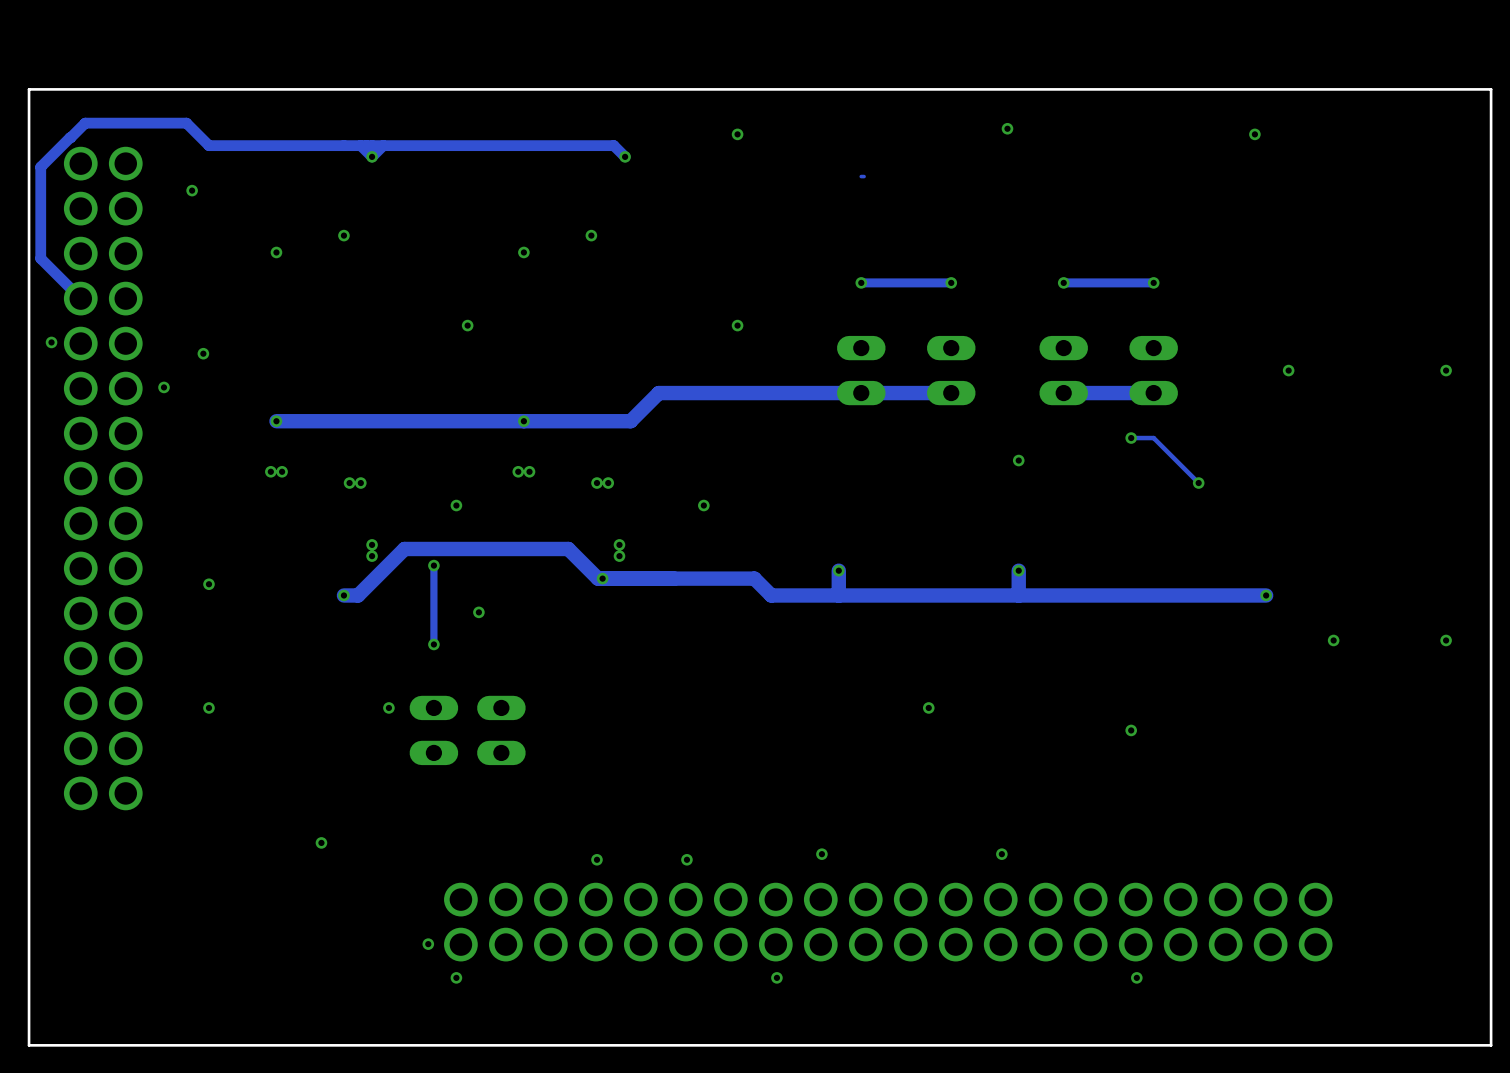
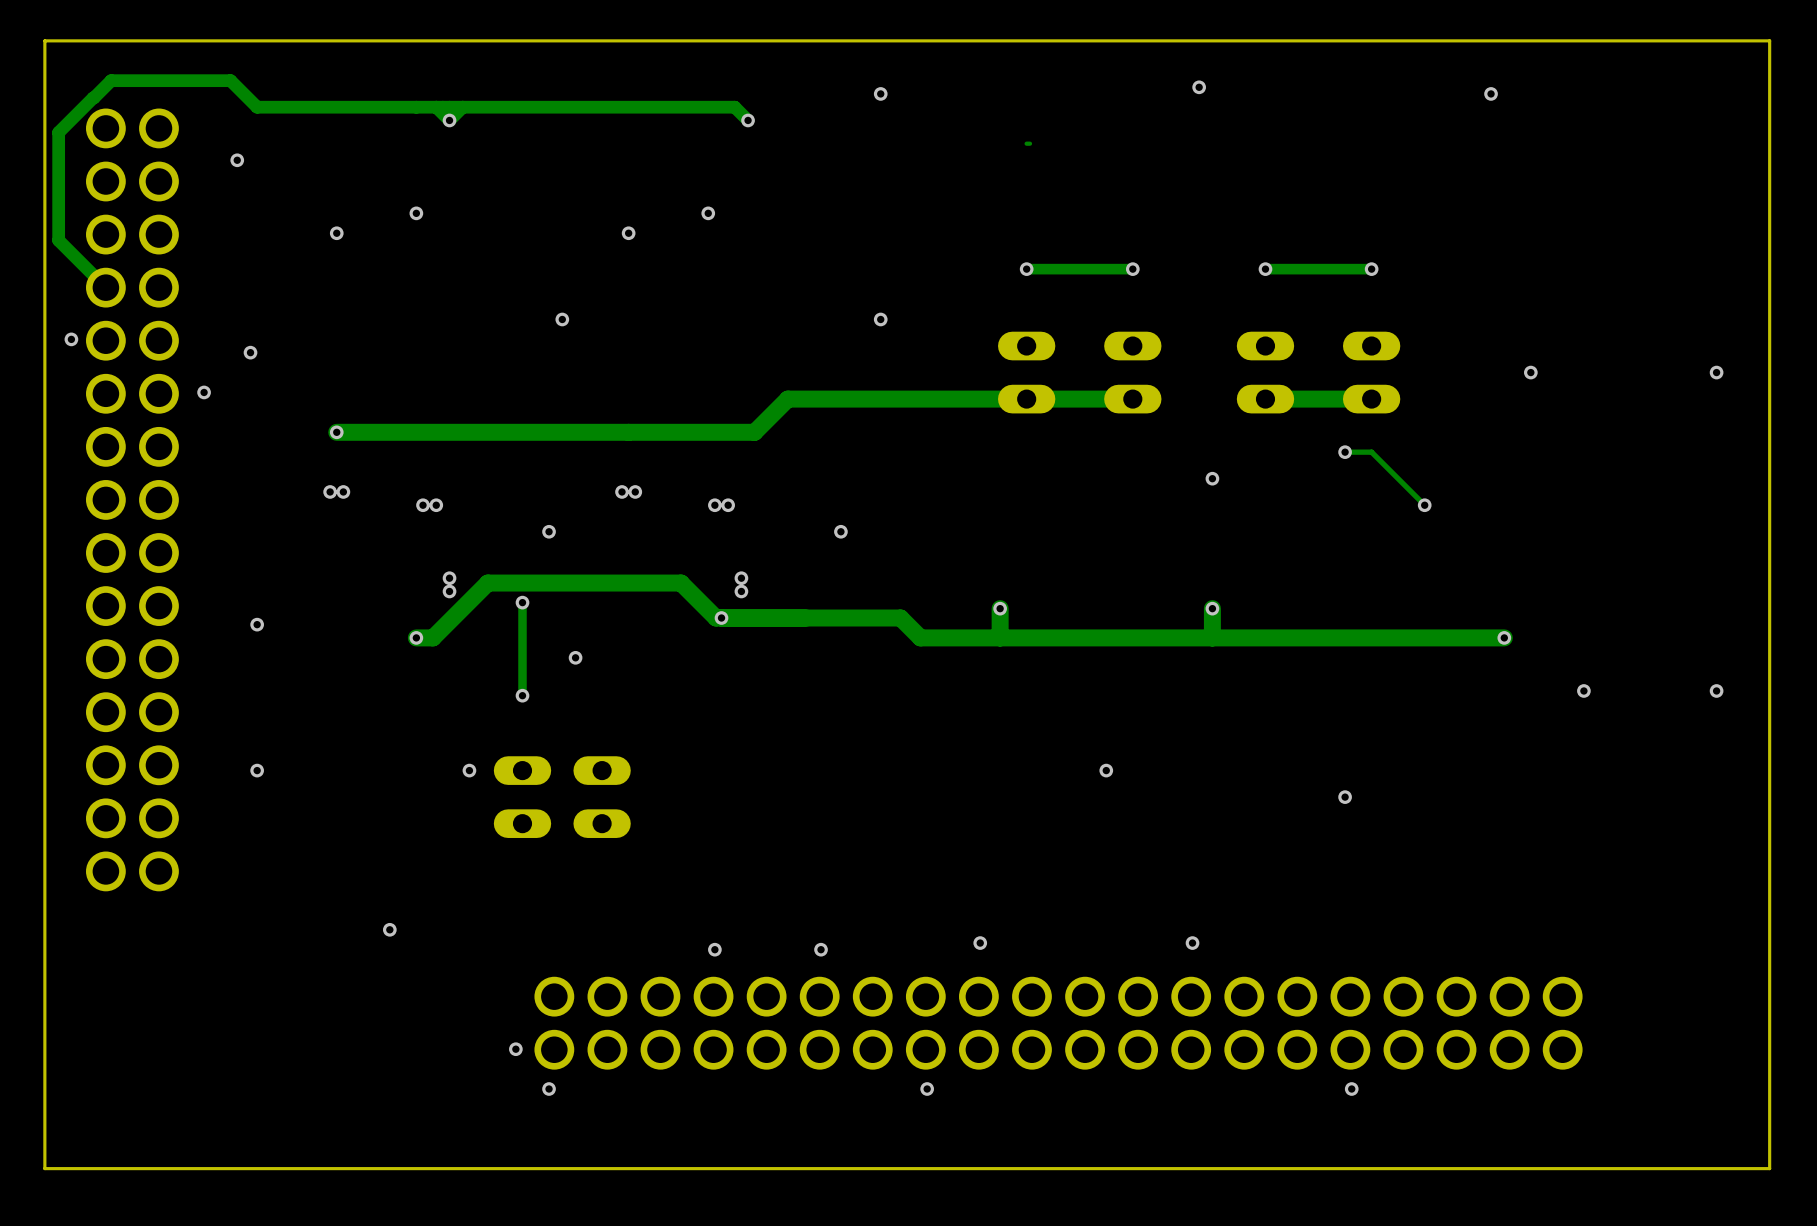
via: (523, 421) -> none

